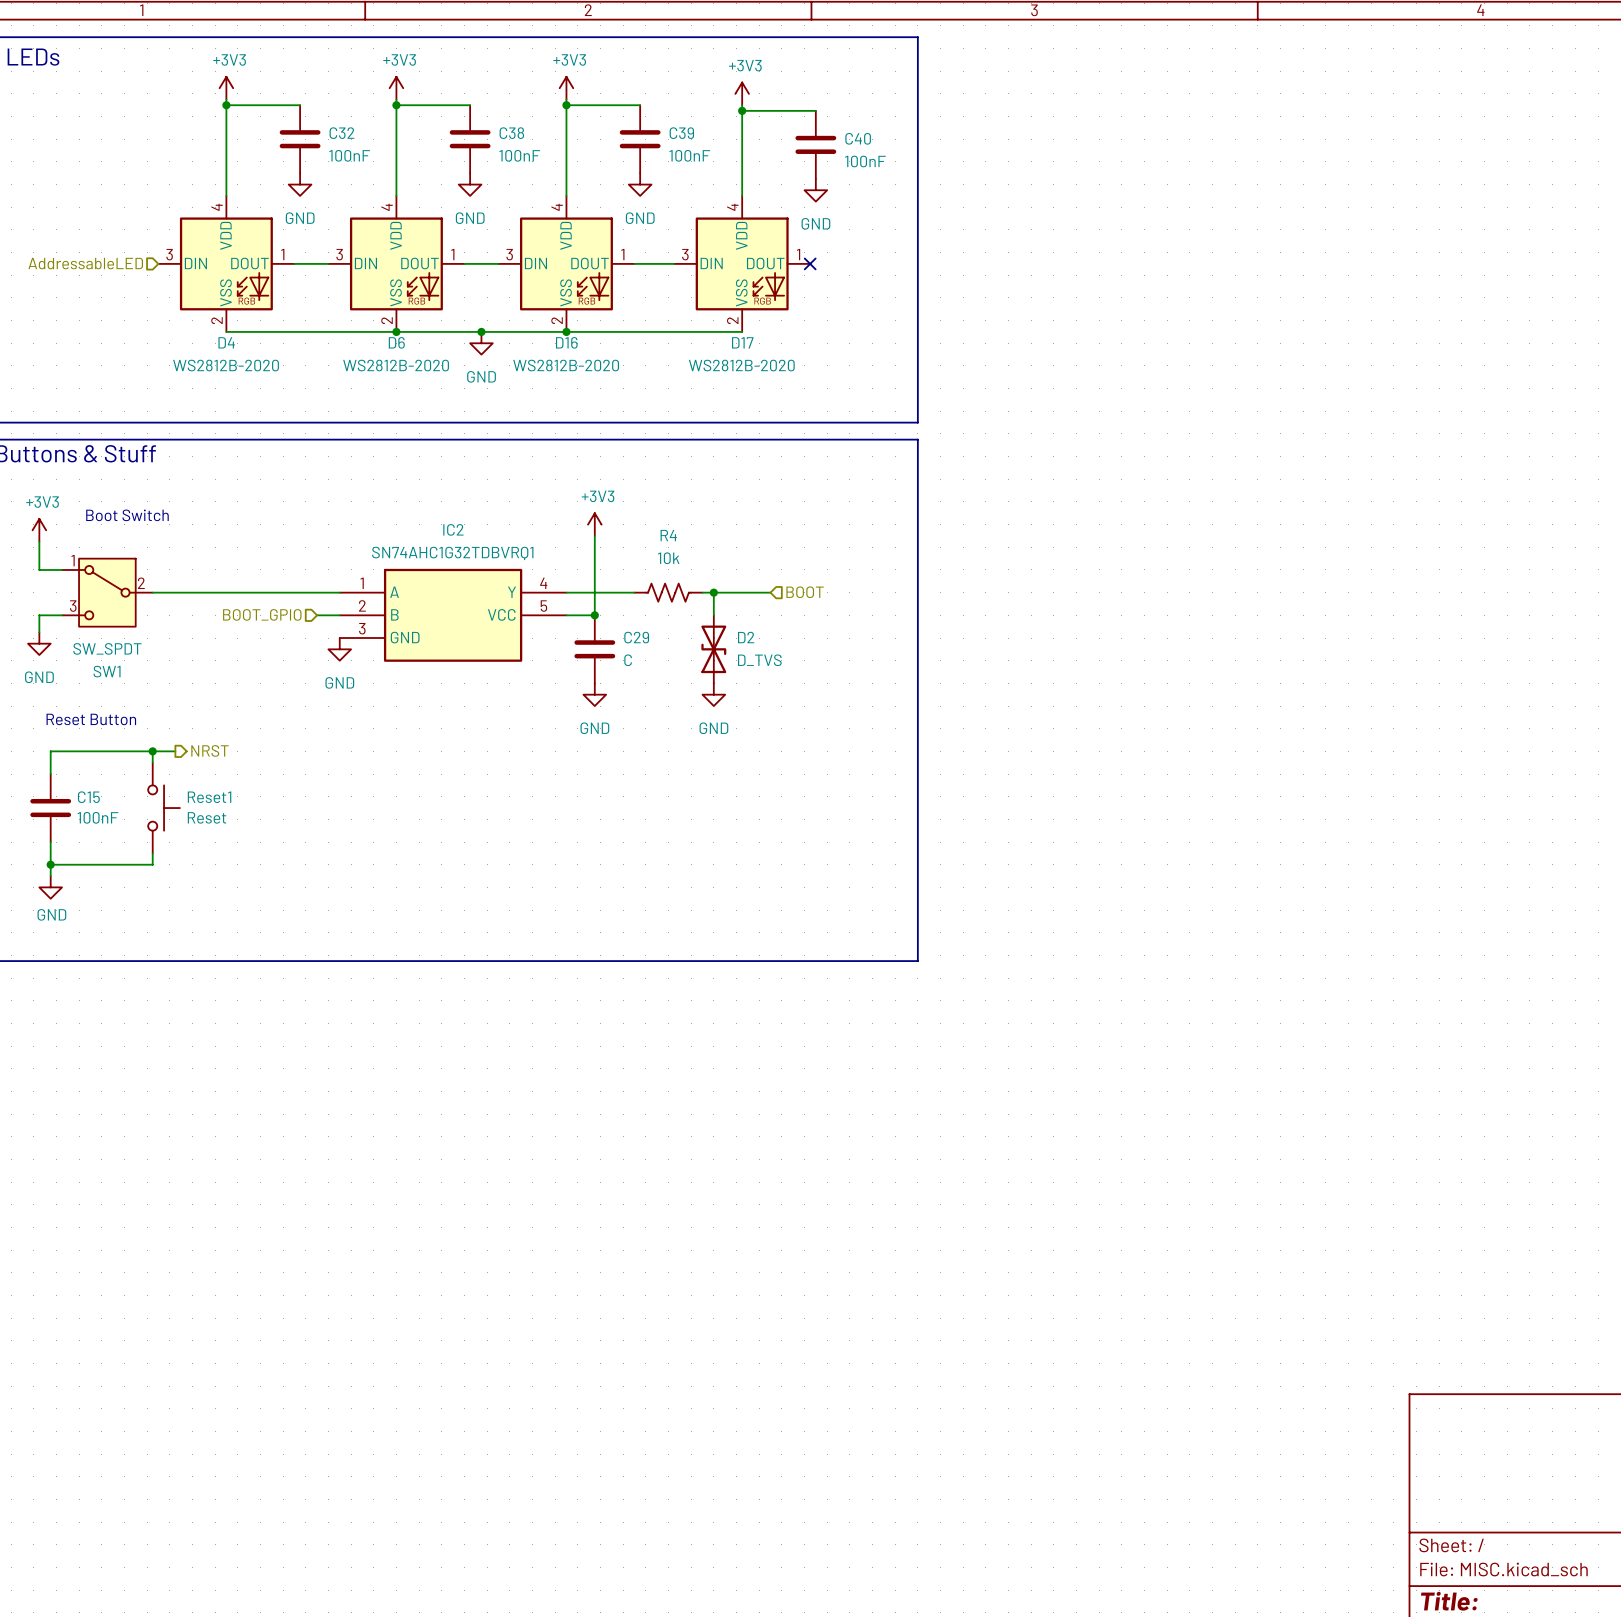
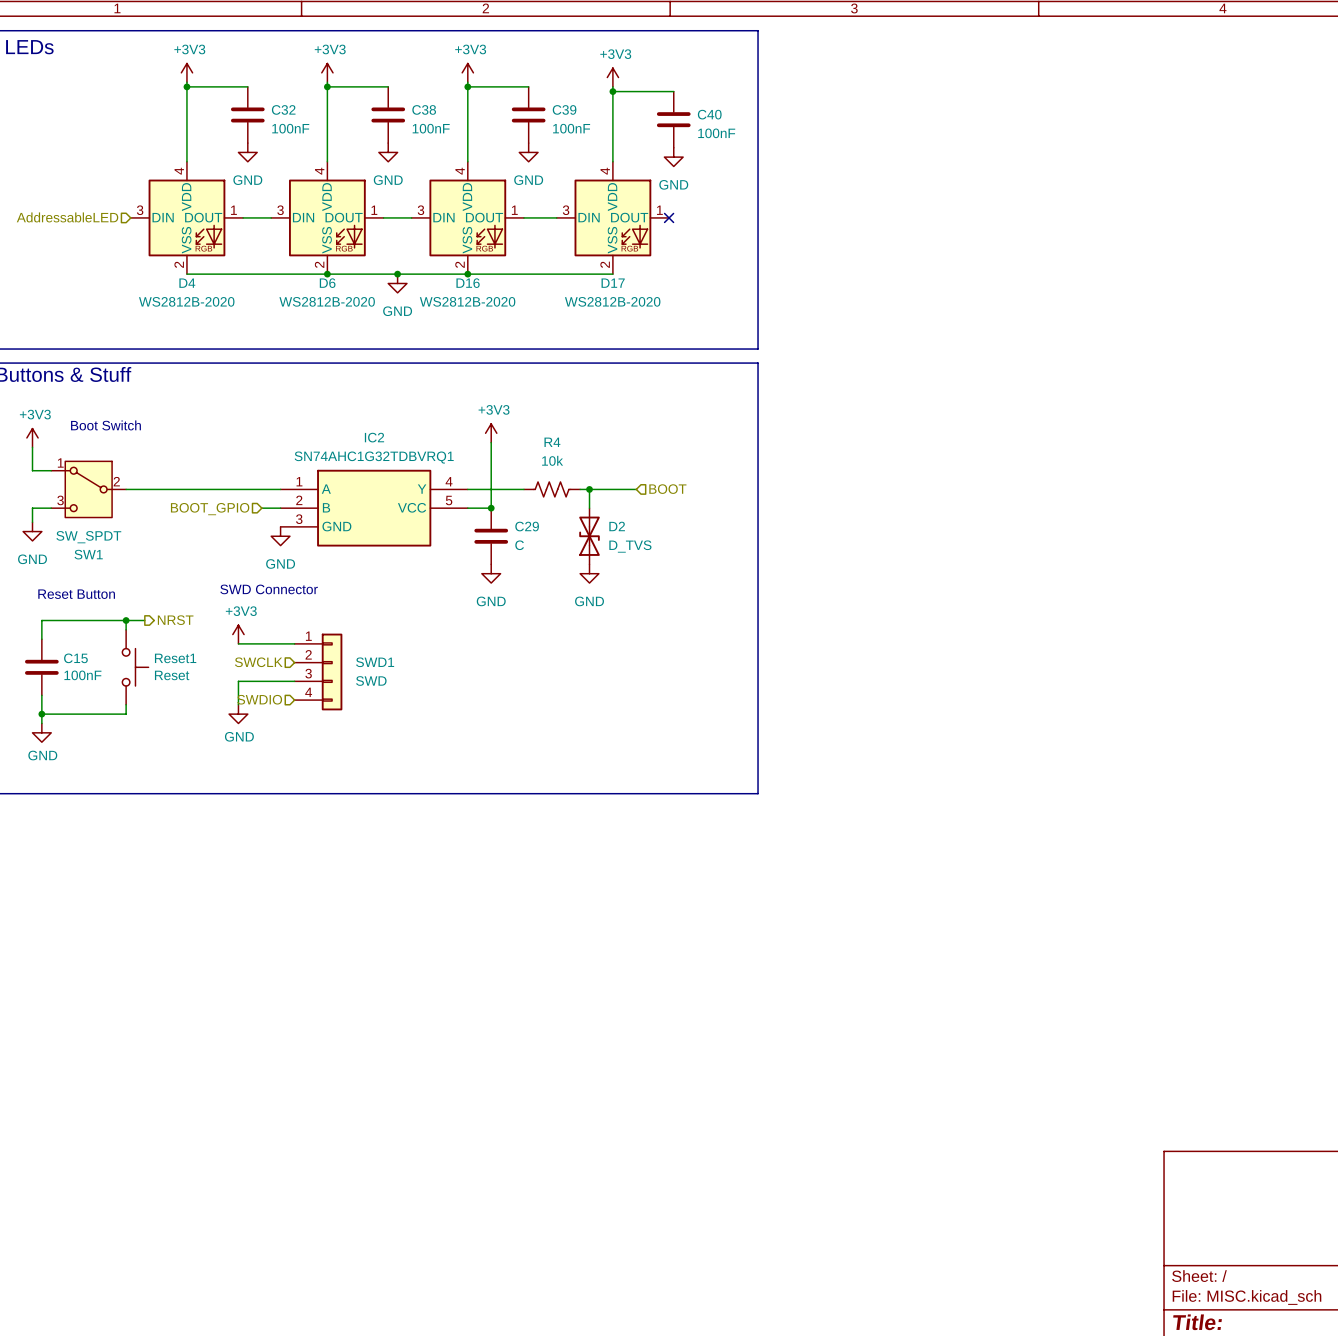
text: none -> SWD Connector (269, 589)
power symbol: none -> +3V3 (238, 634)
wire: none -> (238, 643) (294, 643)
hierarchical label: none -> SWCLK (258, 662)
SWD1: none -> SWD (318, 671)
wire: none -> (294, 681) (238, 681) (238, 704)
hierarchical label: none -> SWDIO (259, 699)
power symbol: none -> GND (238, 714)

